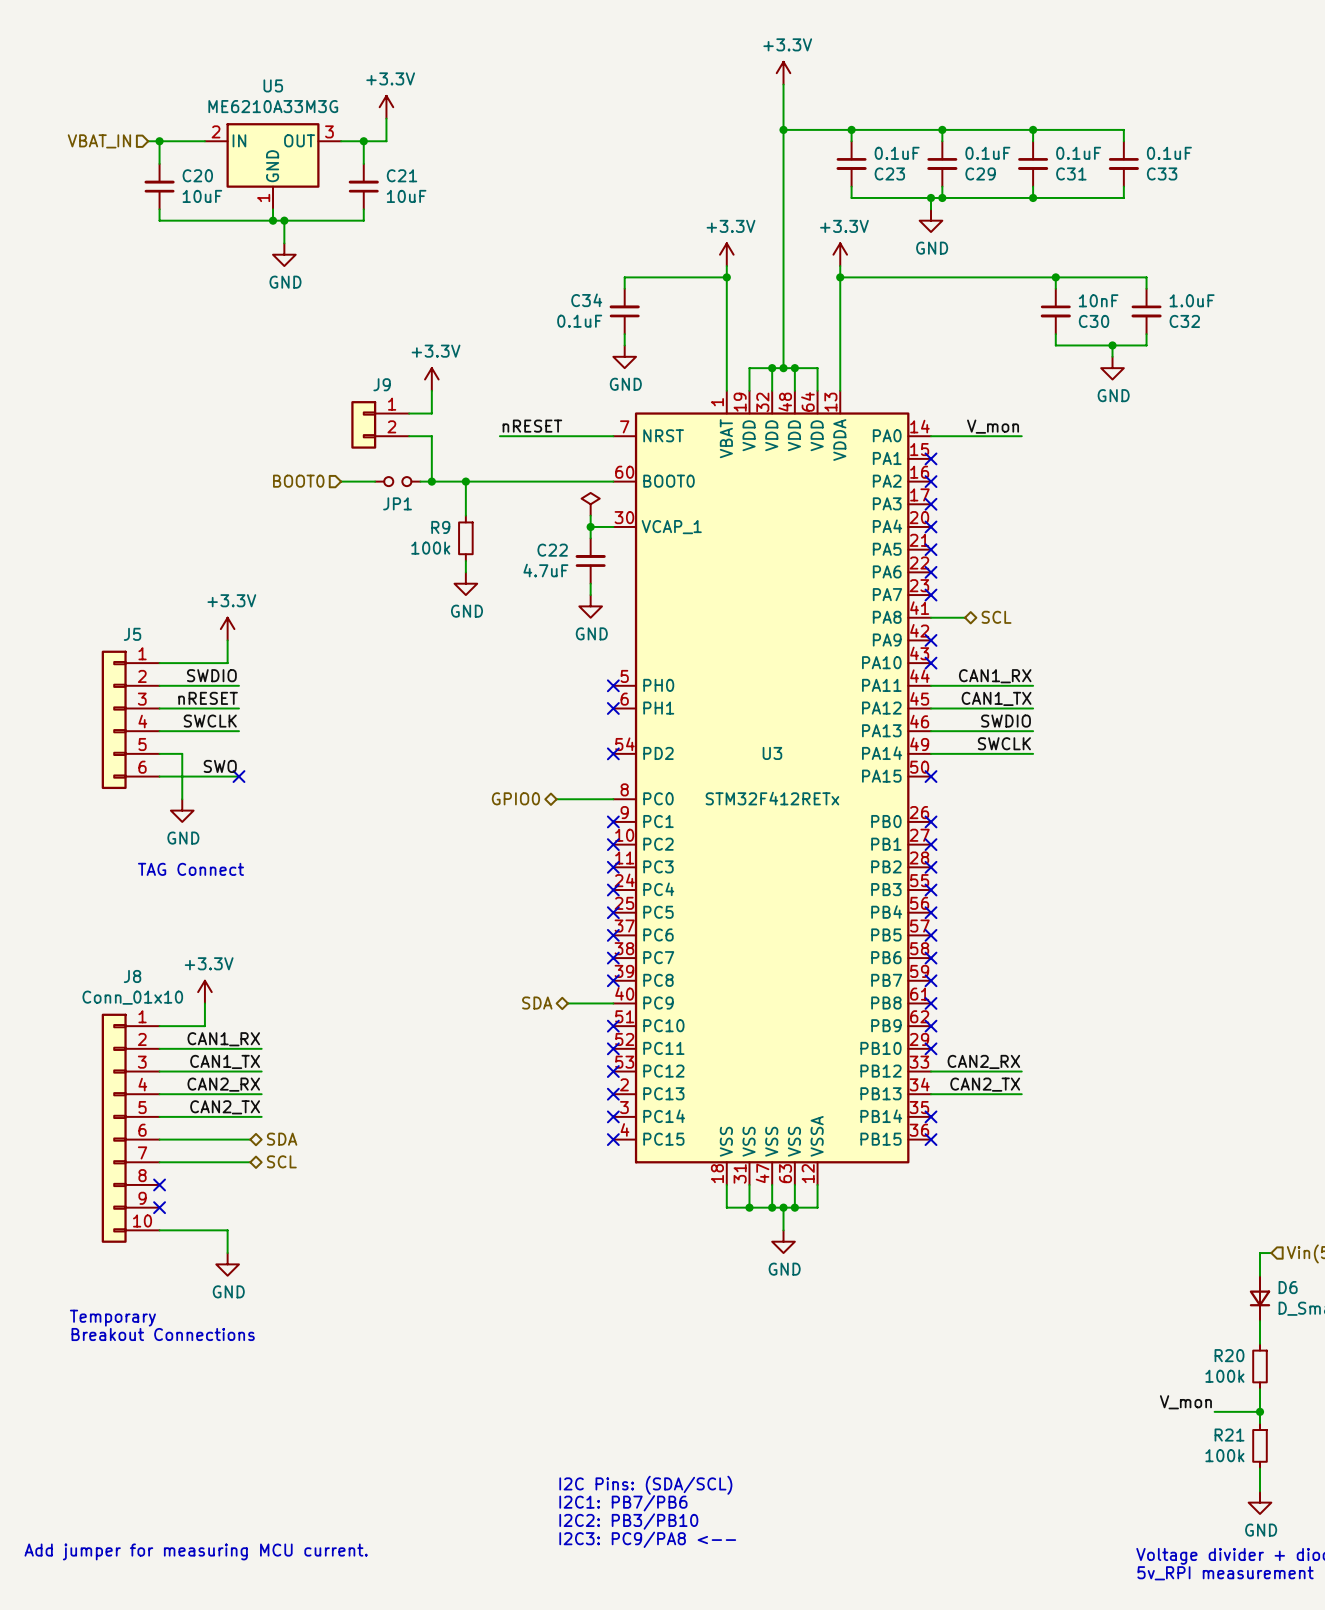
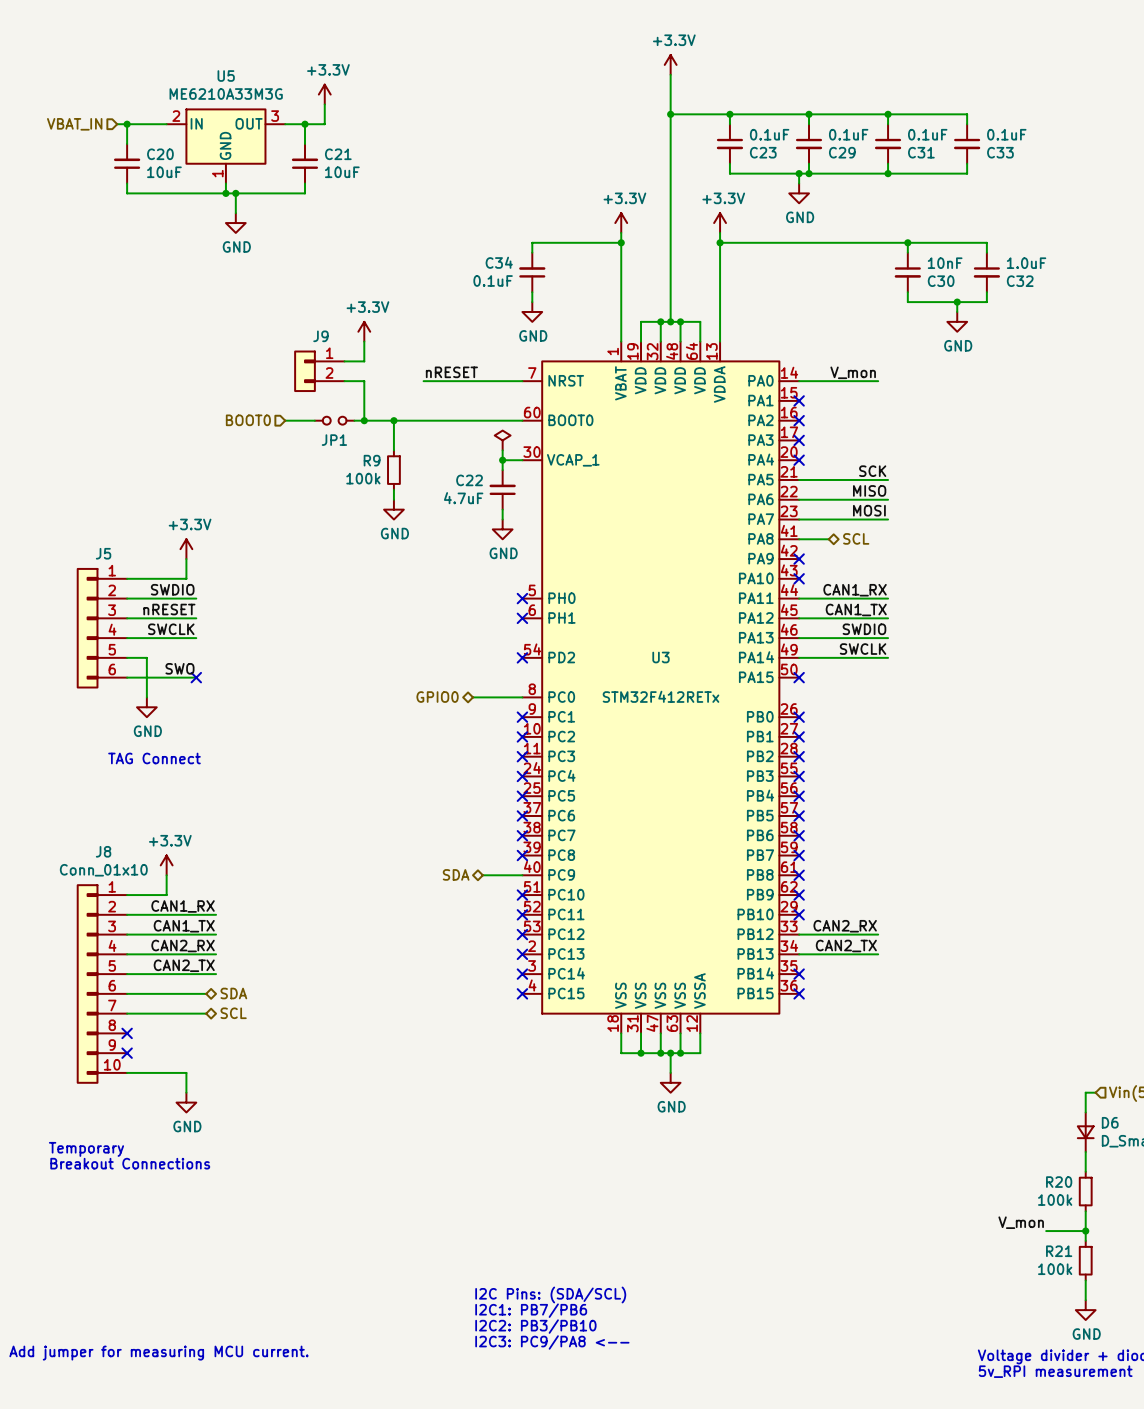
label: none -> SCK (872, 471)
wire: none -> (799, 479) (888, 479)
no-connect mark: (931, 549) -> none
label: none -> MISO (869, 490)
wire: none -> (799, 499) (888, 499)
no-connect mark: (931, 572) -> none
label: none -> MOSI (869, 510)
wire: none -> (799, 519) (888, 519)
no-connect mark: (931, 595) -> none

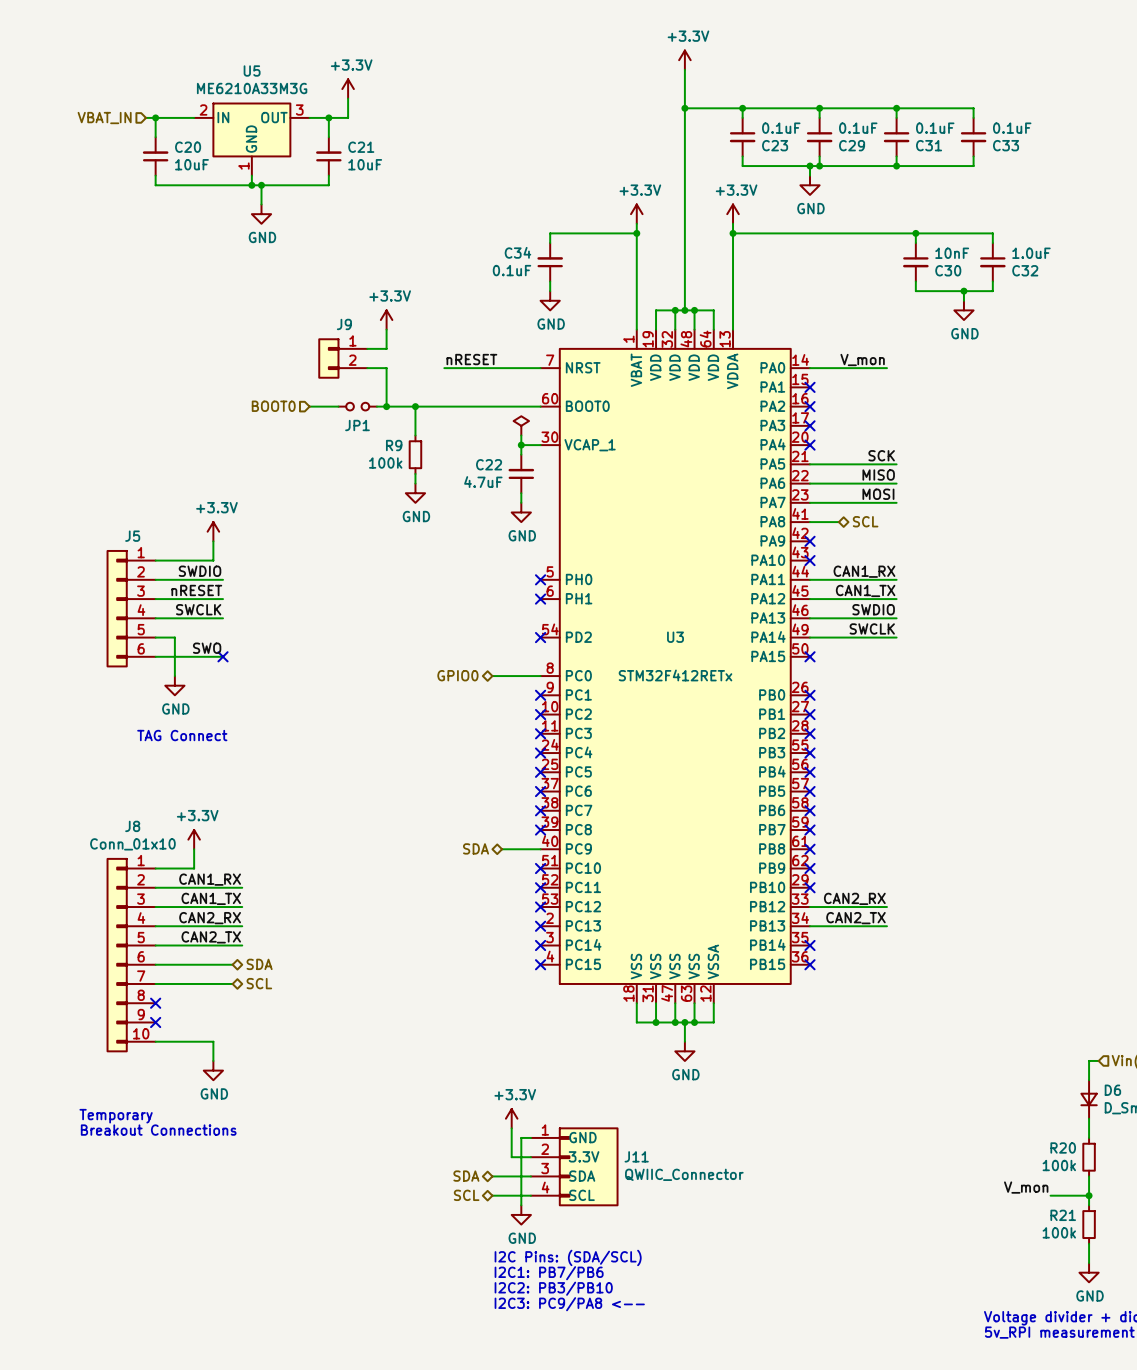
power symbol: none -> +3.3V (511, 1118)
wire: none -> (511, 1128) (511, 1157) (530, 1157)
wire: none -> (530, 1137) (521, 1137) (521, 1205)
J11: none -> QWIIC_Connector (574, 1166)
hierarchical label: none -> SDA (466, 1176)
wire: none -> (492, 1176) (530, 1176)
hierarchical label: none -> SCL (466, 1195)
wire: none -> (492, 1195) (530, 1195)
power symbol: none -> GND (521, 1214)
text: Add jumper for measuring MCU current. (158, 1353) -> none

